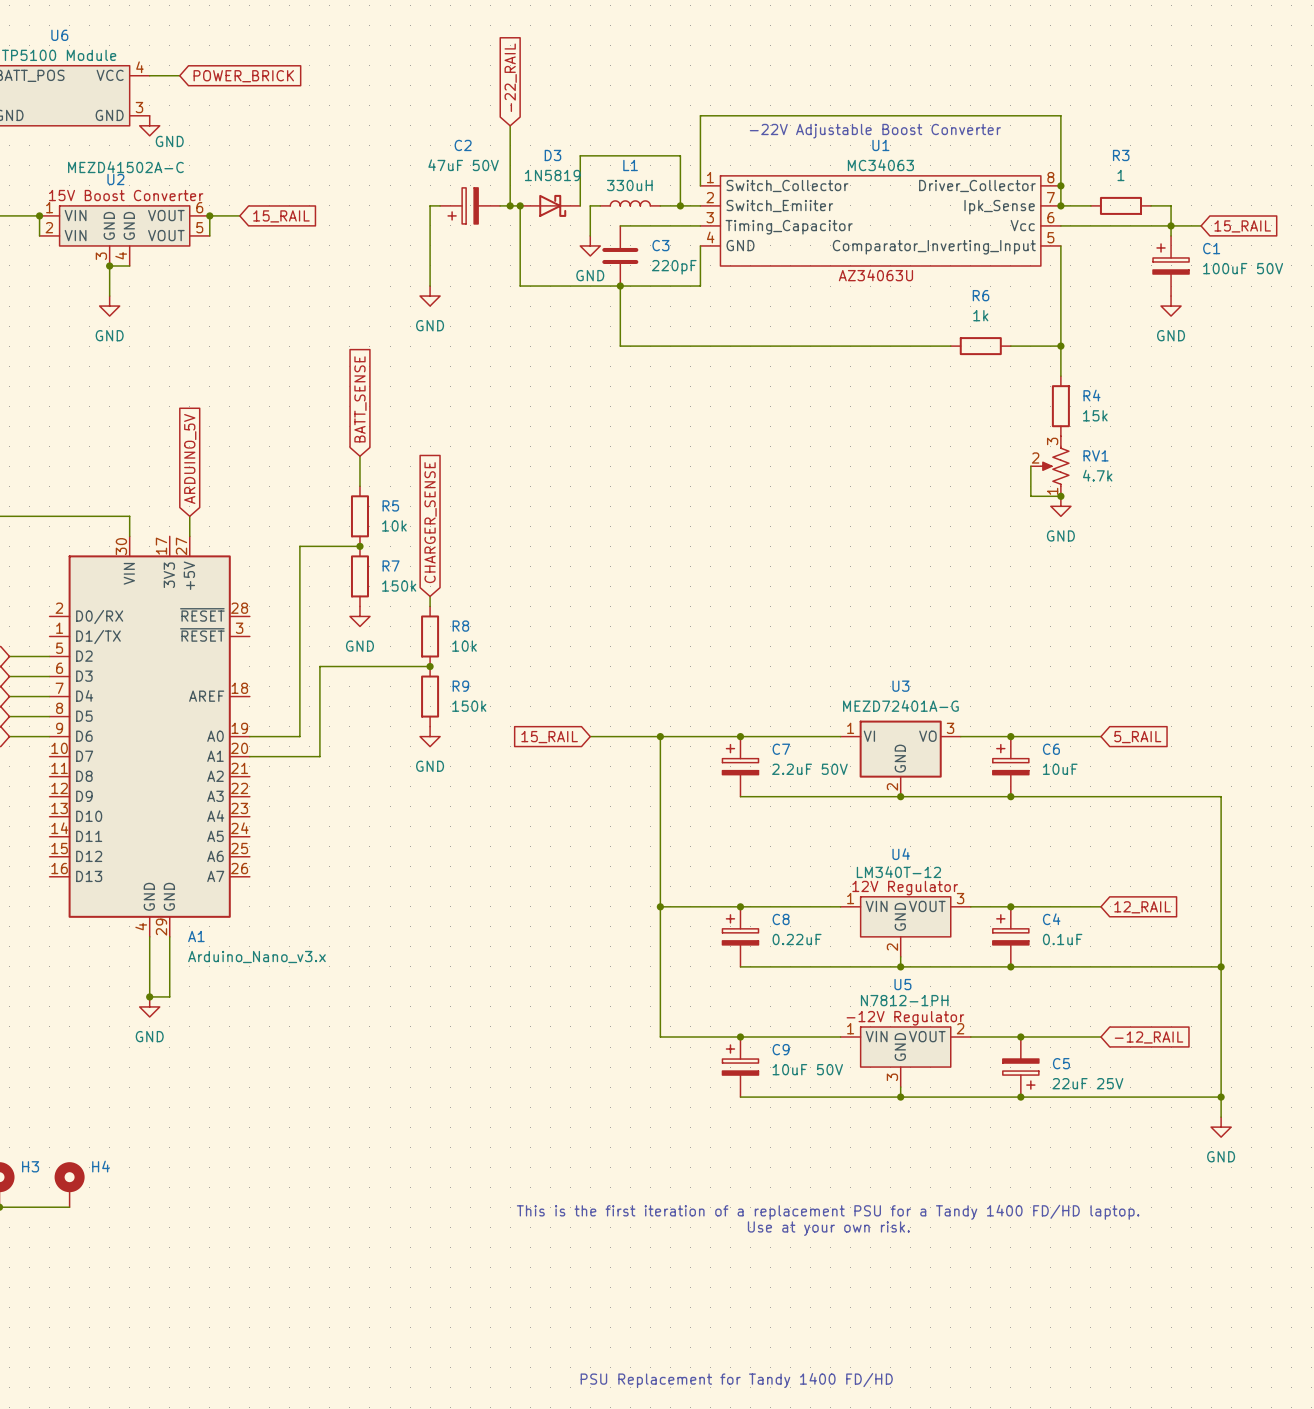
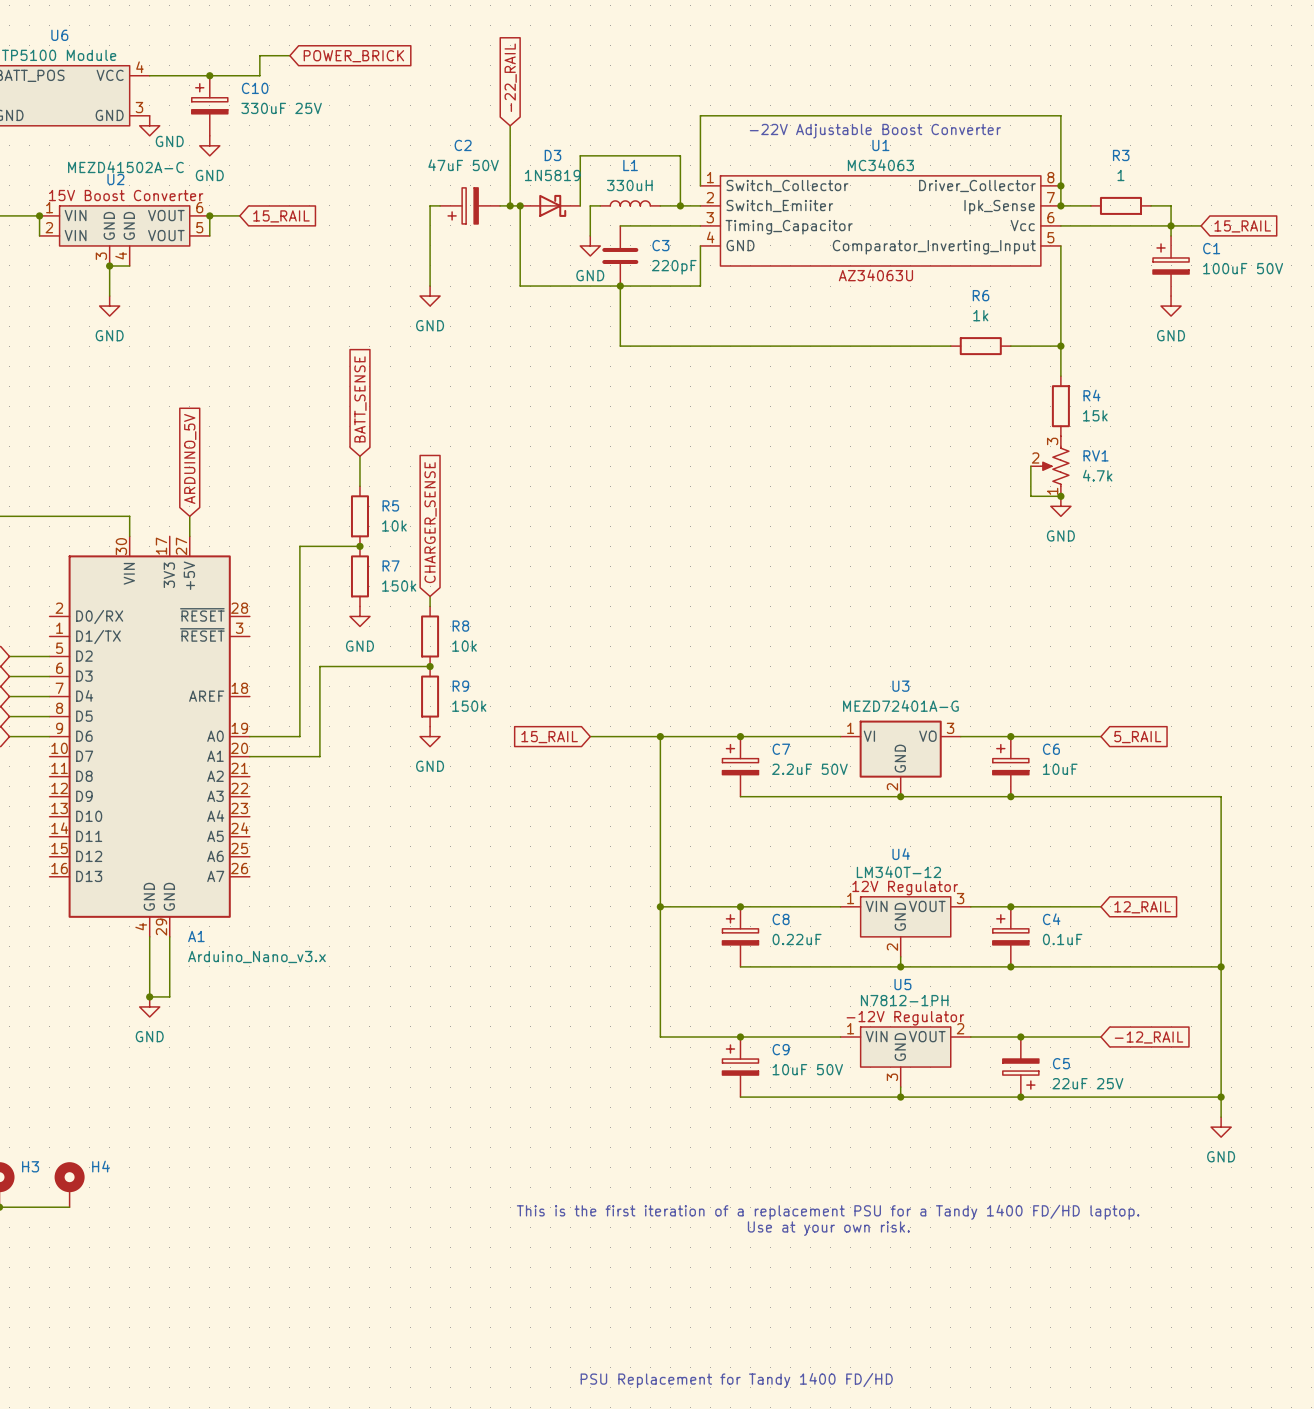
wire: none -> (289, 55) (259, 55) (259, 75) (179, 75)
junction: none -> (209, 75)
global label position: POWER_BRICK (243, 76) -> POWER_BRICK (353, 56)
C10: none -> 330uF 25V (209, 105)
power symbol: none -> GND (209, 145)

